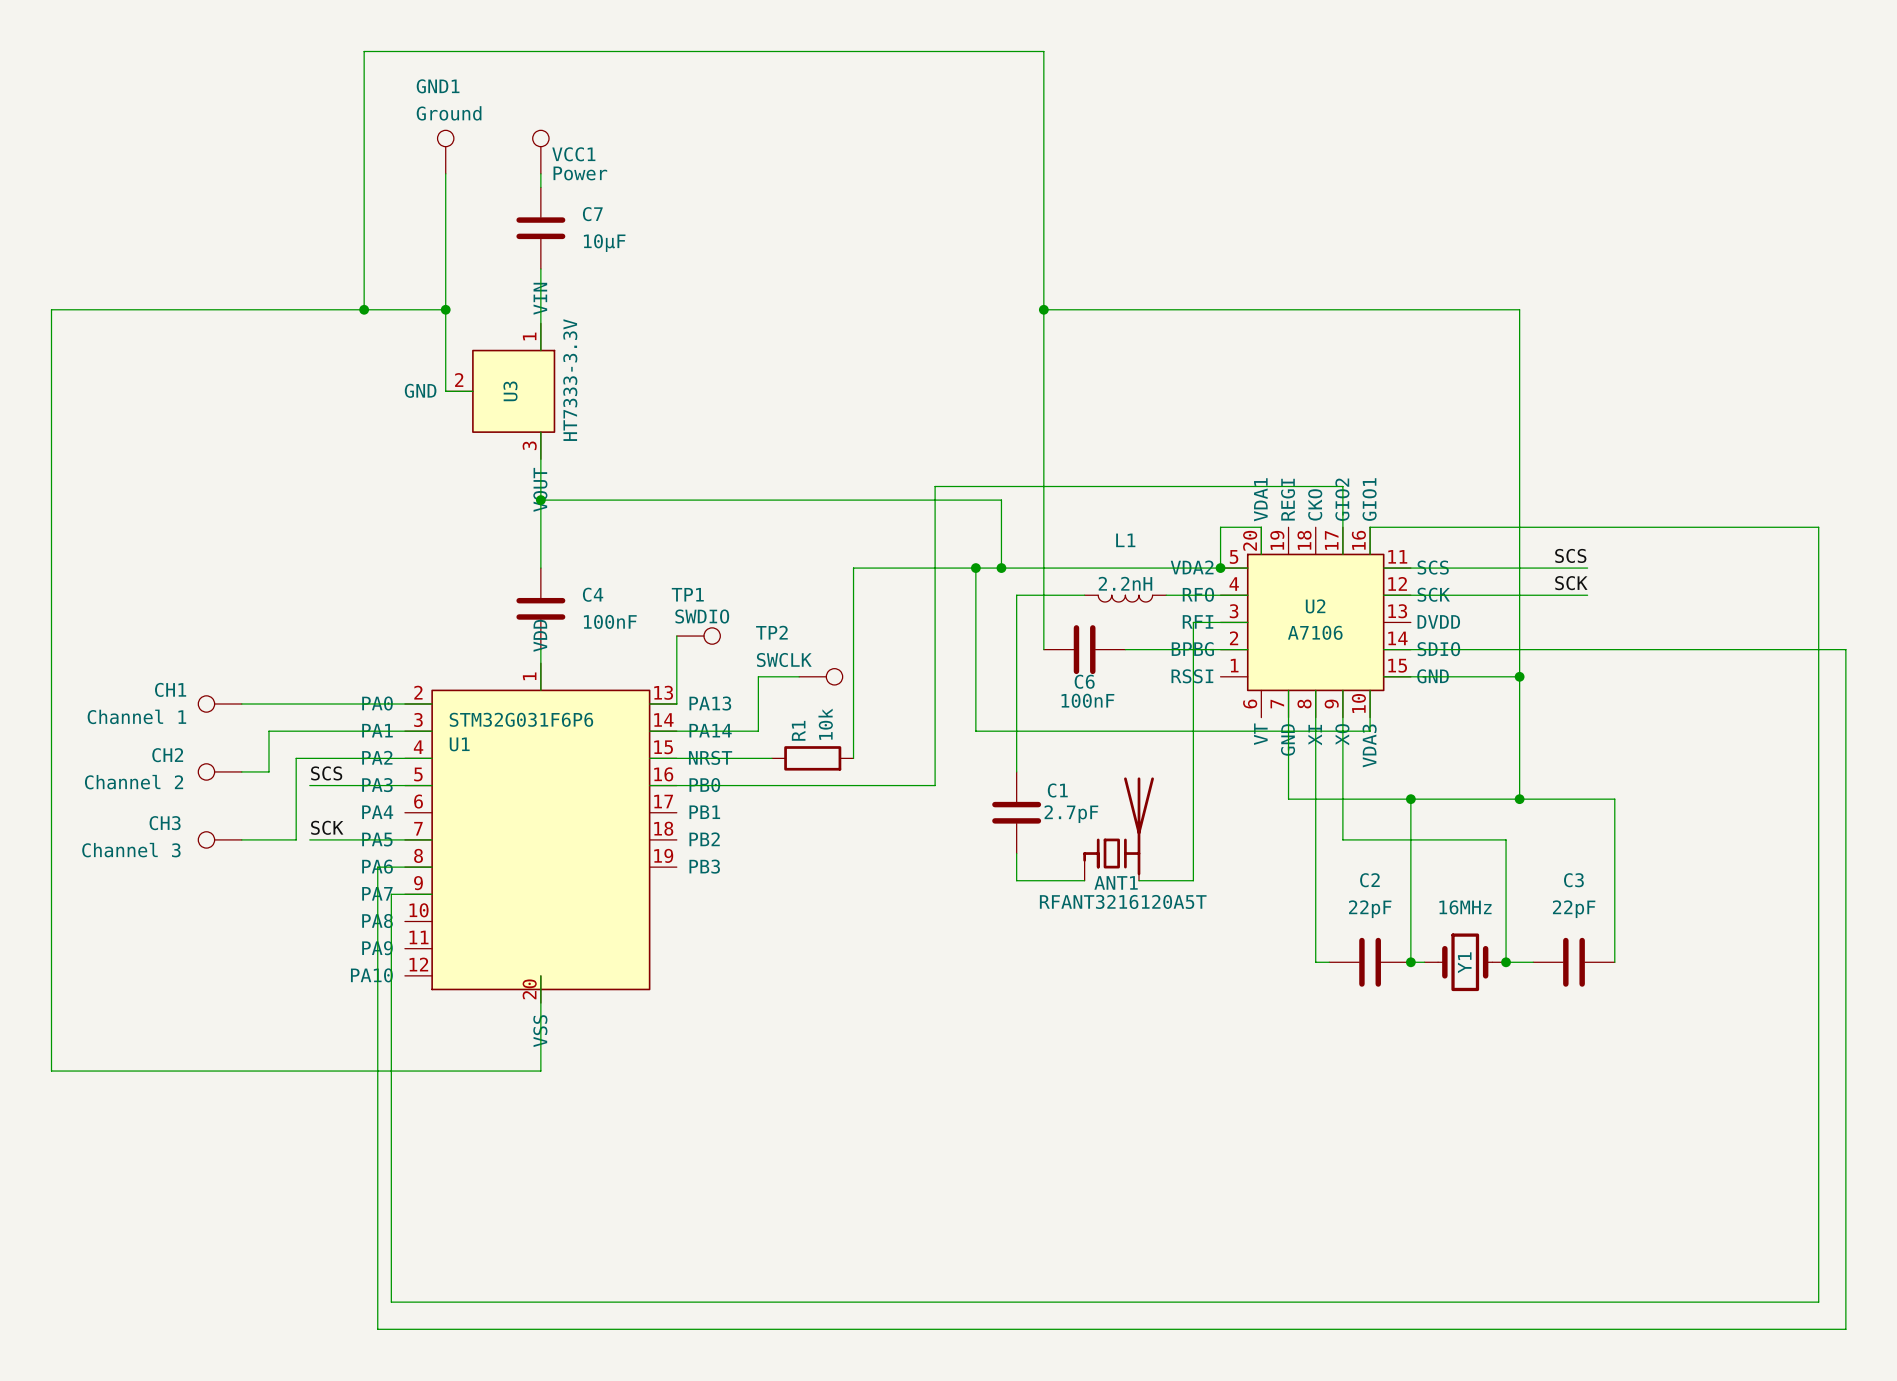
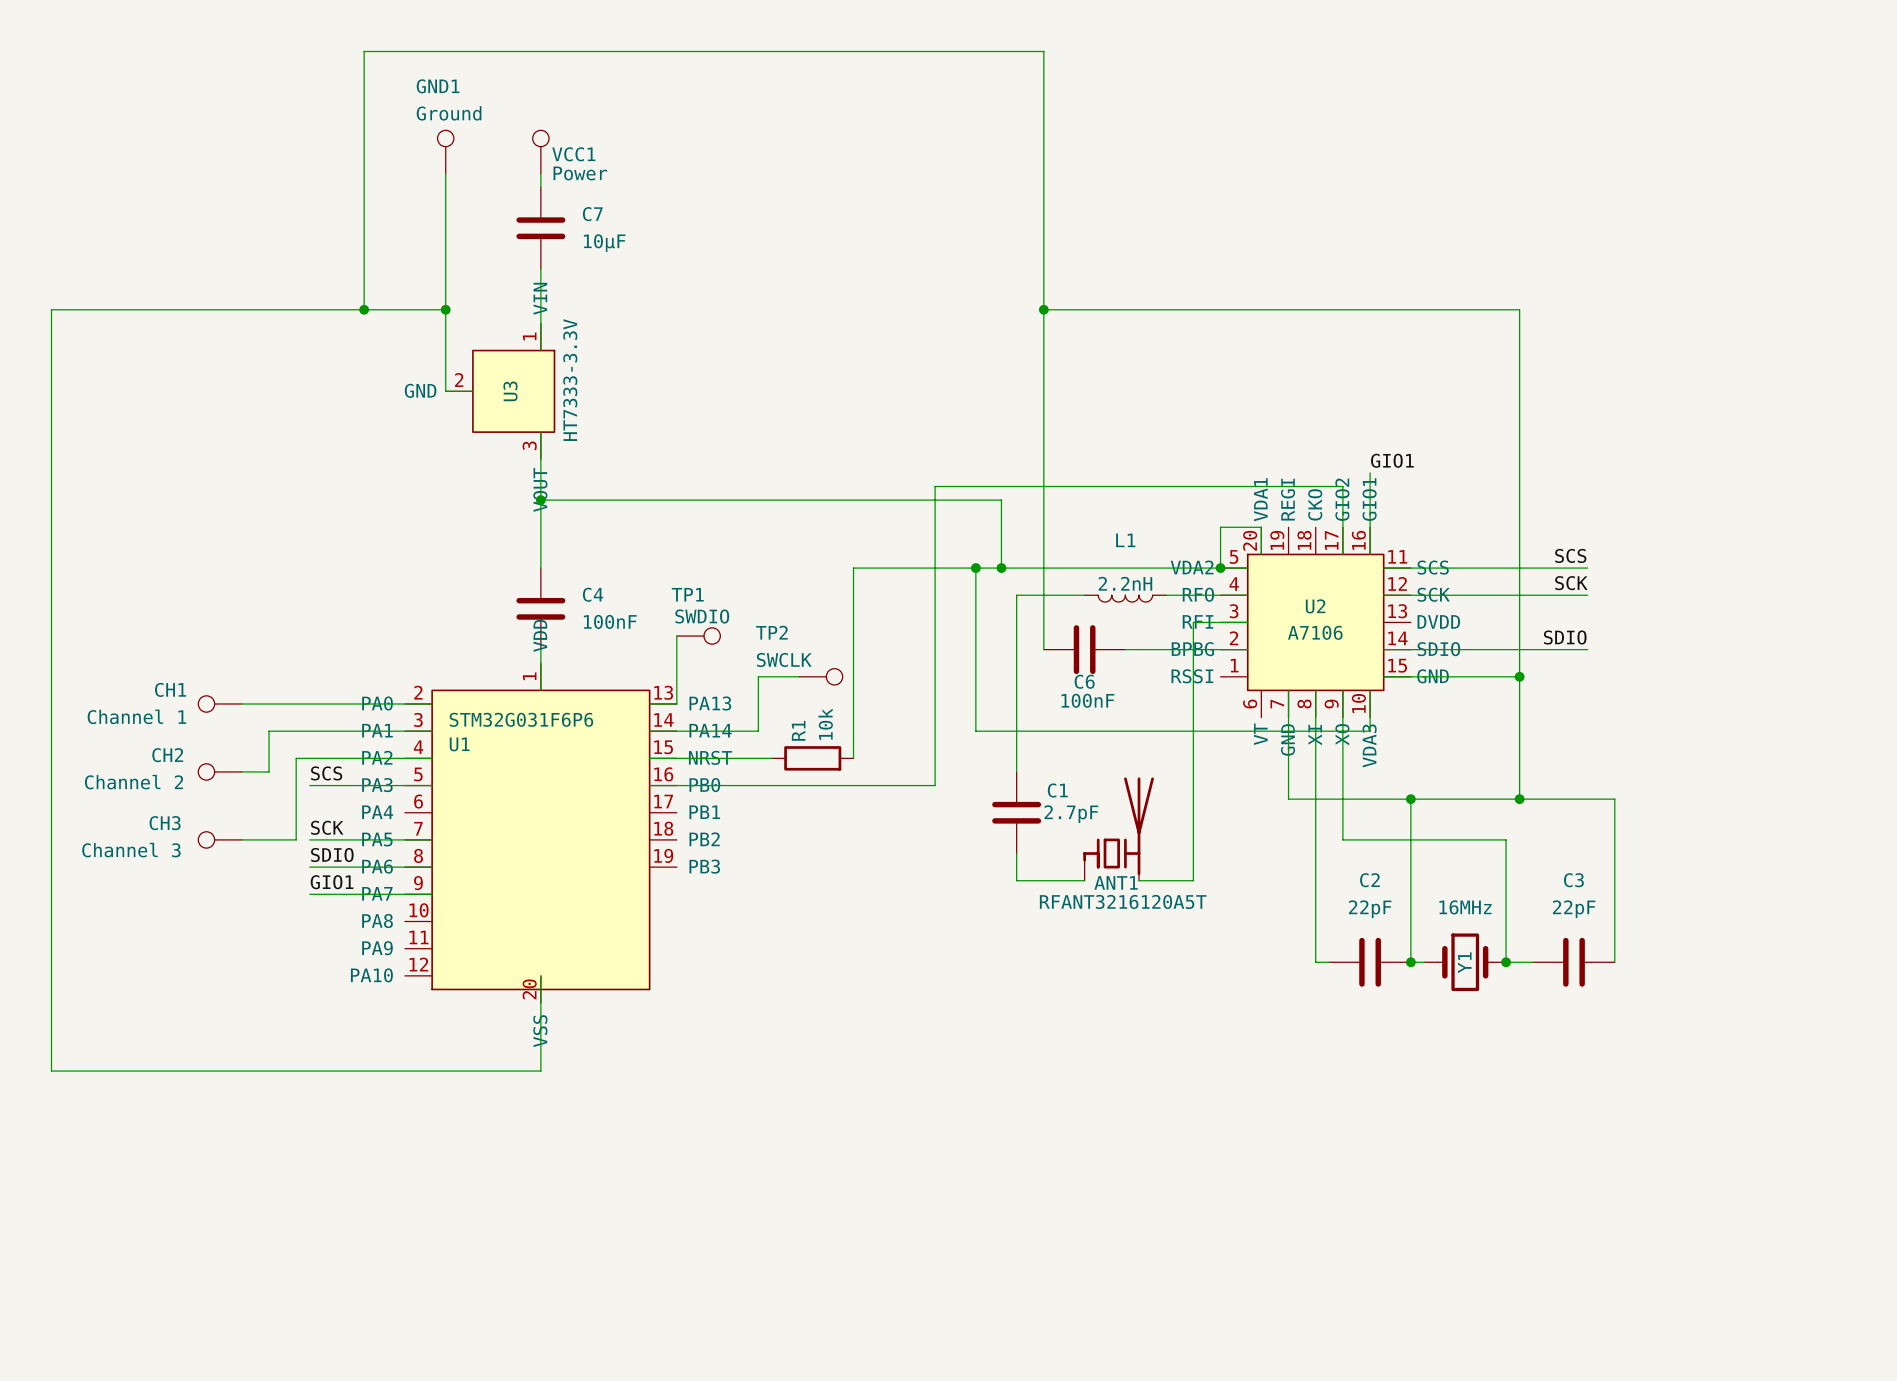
label: none -> GIO1 (1392, 460)
wire: (1370, 527) (1818, 527) (1818, 1302) (391, 1302) (391, 894) -> (1370, 527) (1370, 472)
label: none -> SDIO (1565, 637)
wire: (1587, 649) (1845, 649) (1845, 1329) (377, 1329) (377, 867) -> (309, 867) (377, 867)
label: none -> SDIO (332, 855)
label: none -> GIO1 (332, 882)
wire: none -> (309, 894) (391, 894)

